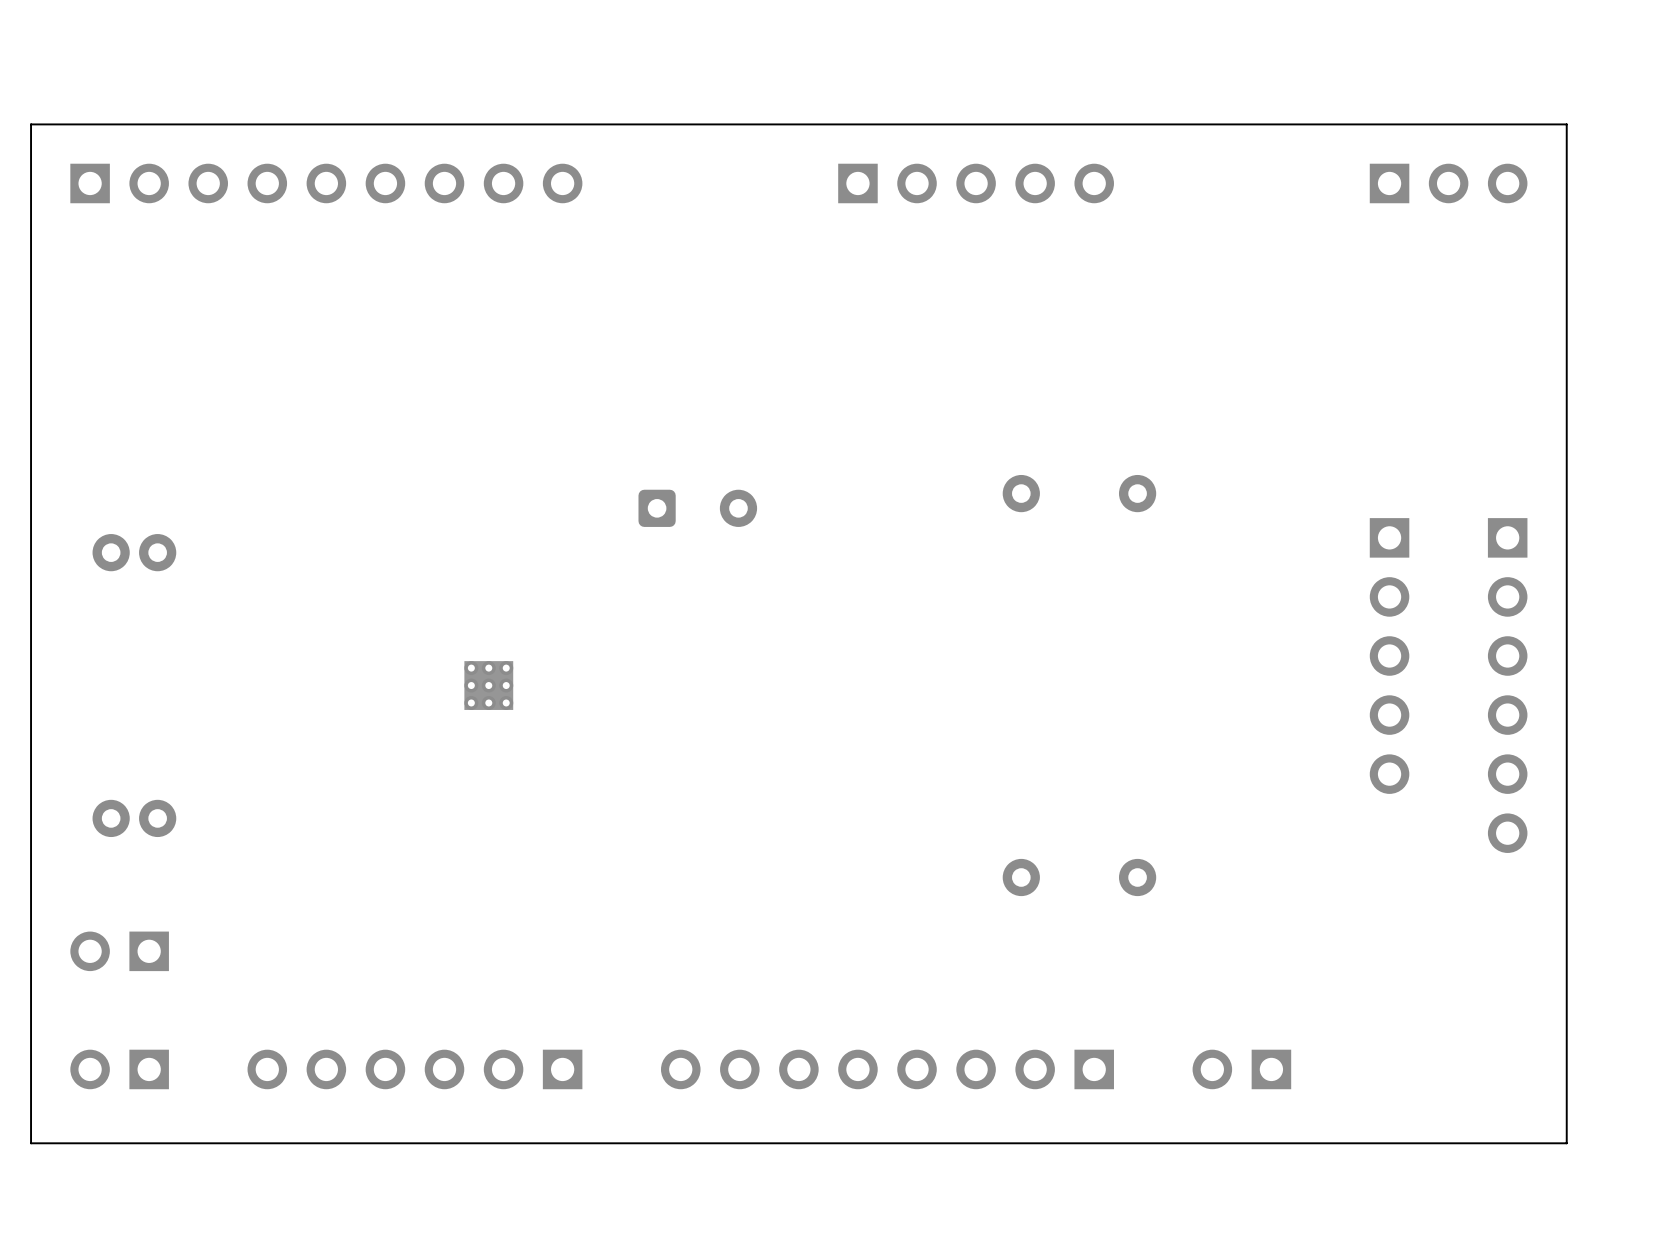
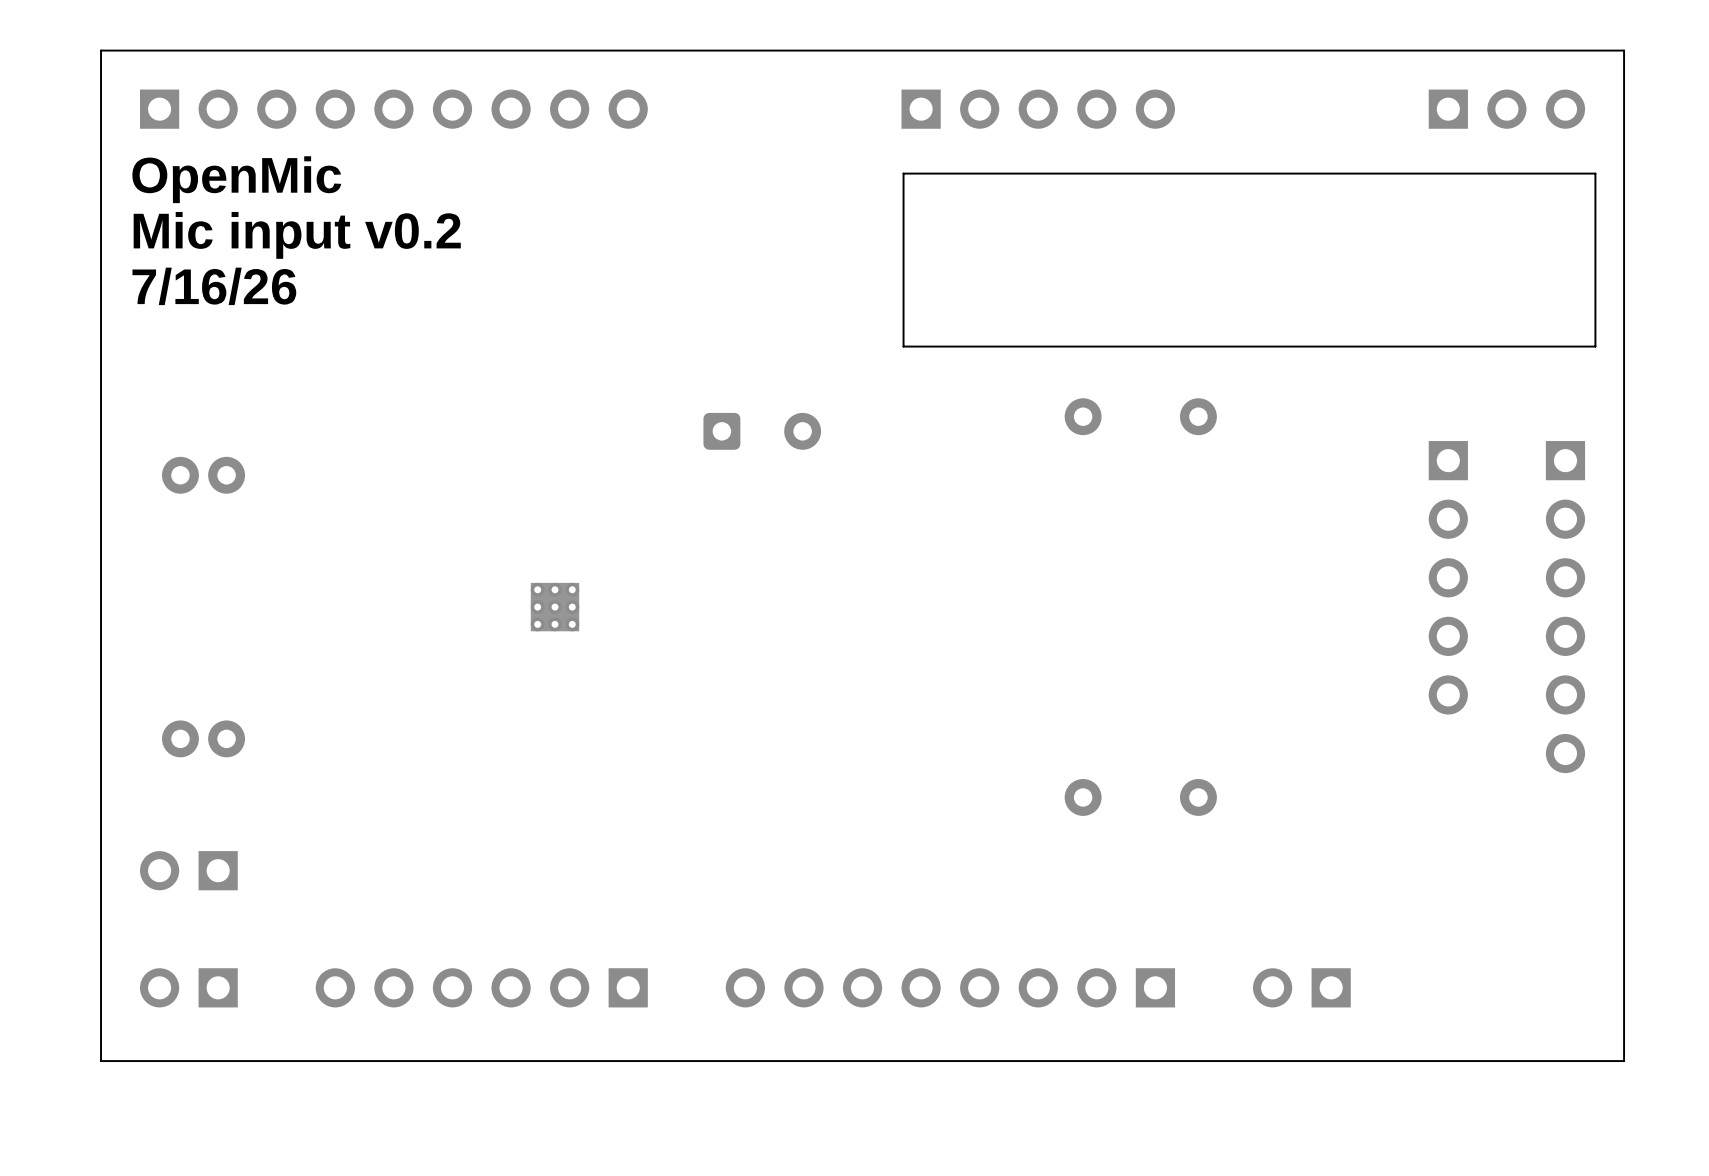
line: none -> (1595, 173) (903, 173) (903, 346) (1595, 346) (1595, 173)
text: none -> OpenMic (236, 179)
text: none -> Mic input v0.2 (297, 235)
text: none -> 7/16/26 (214, 286)

